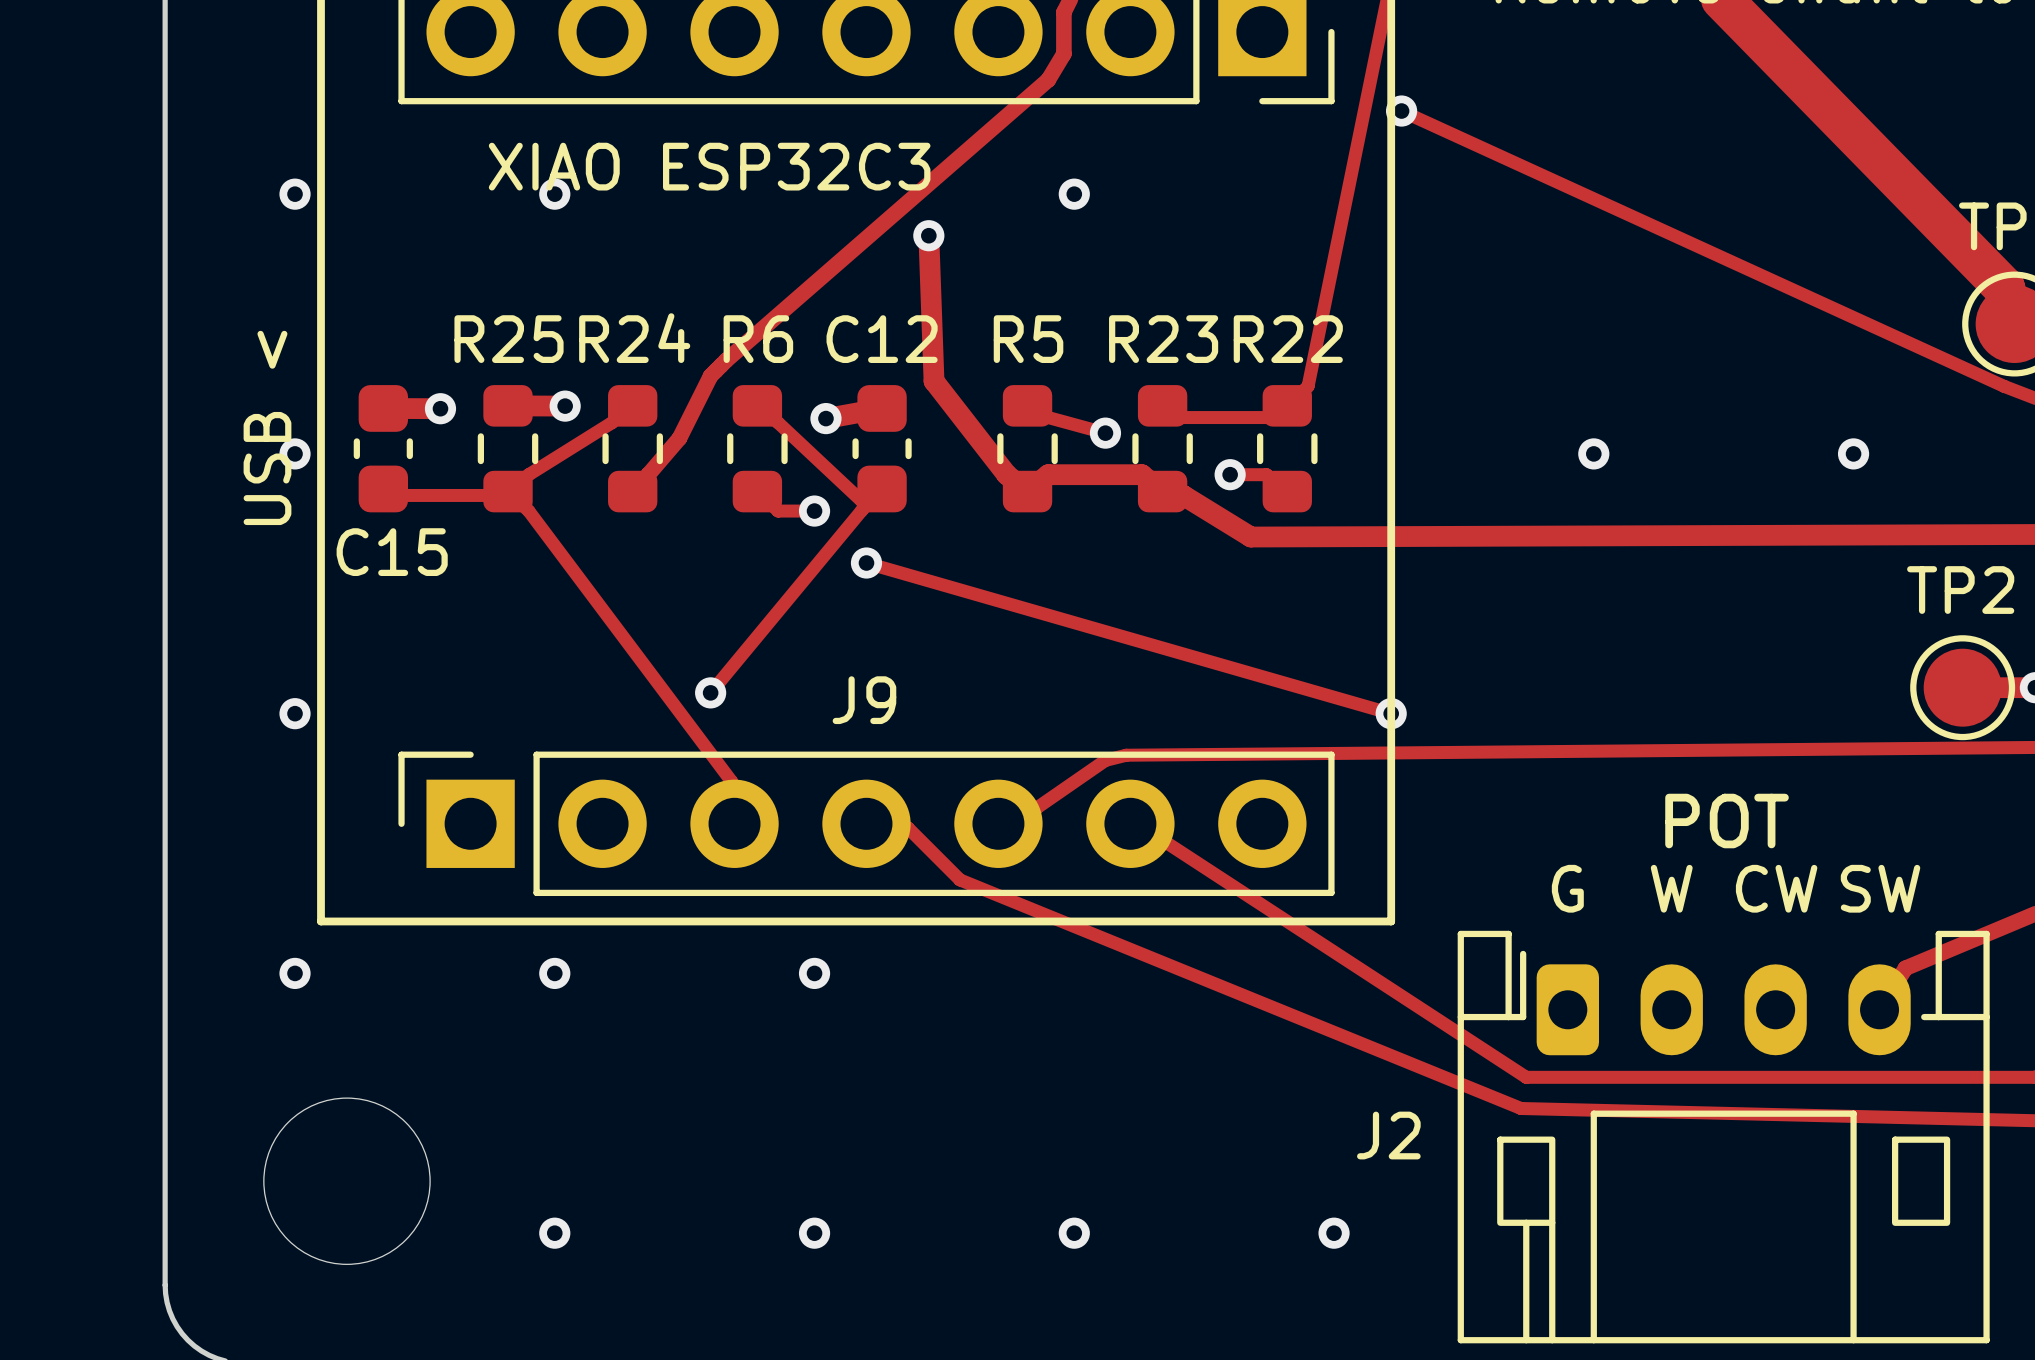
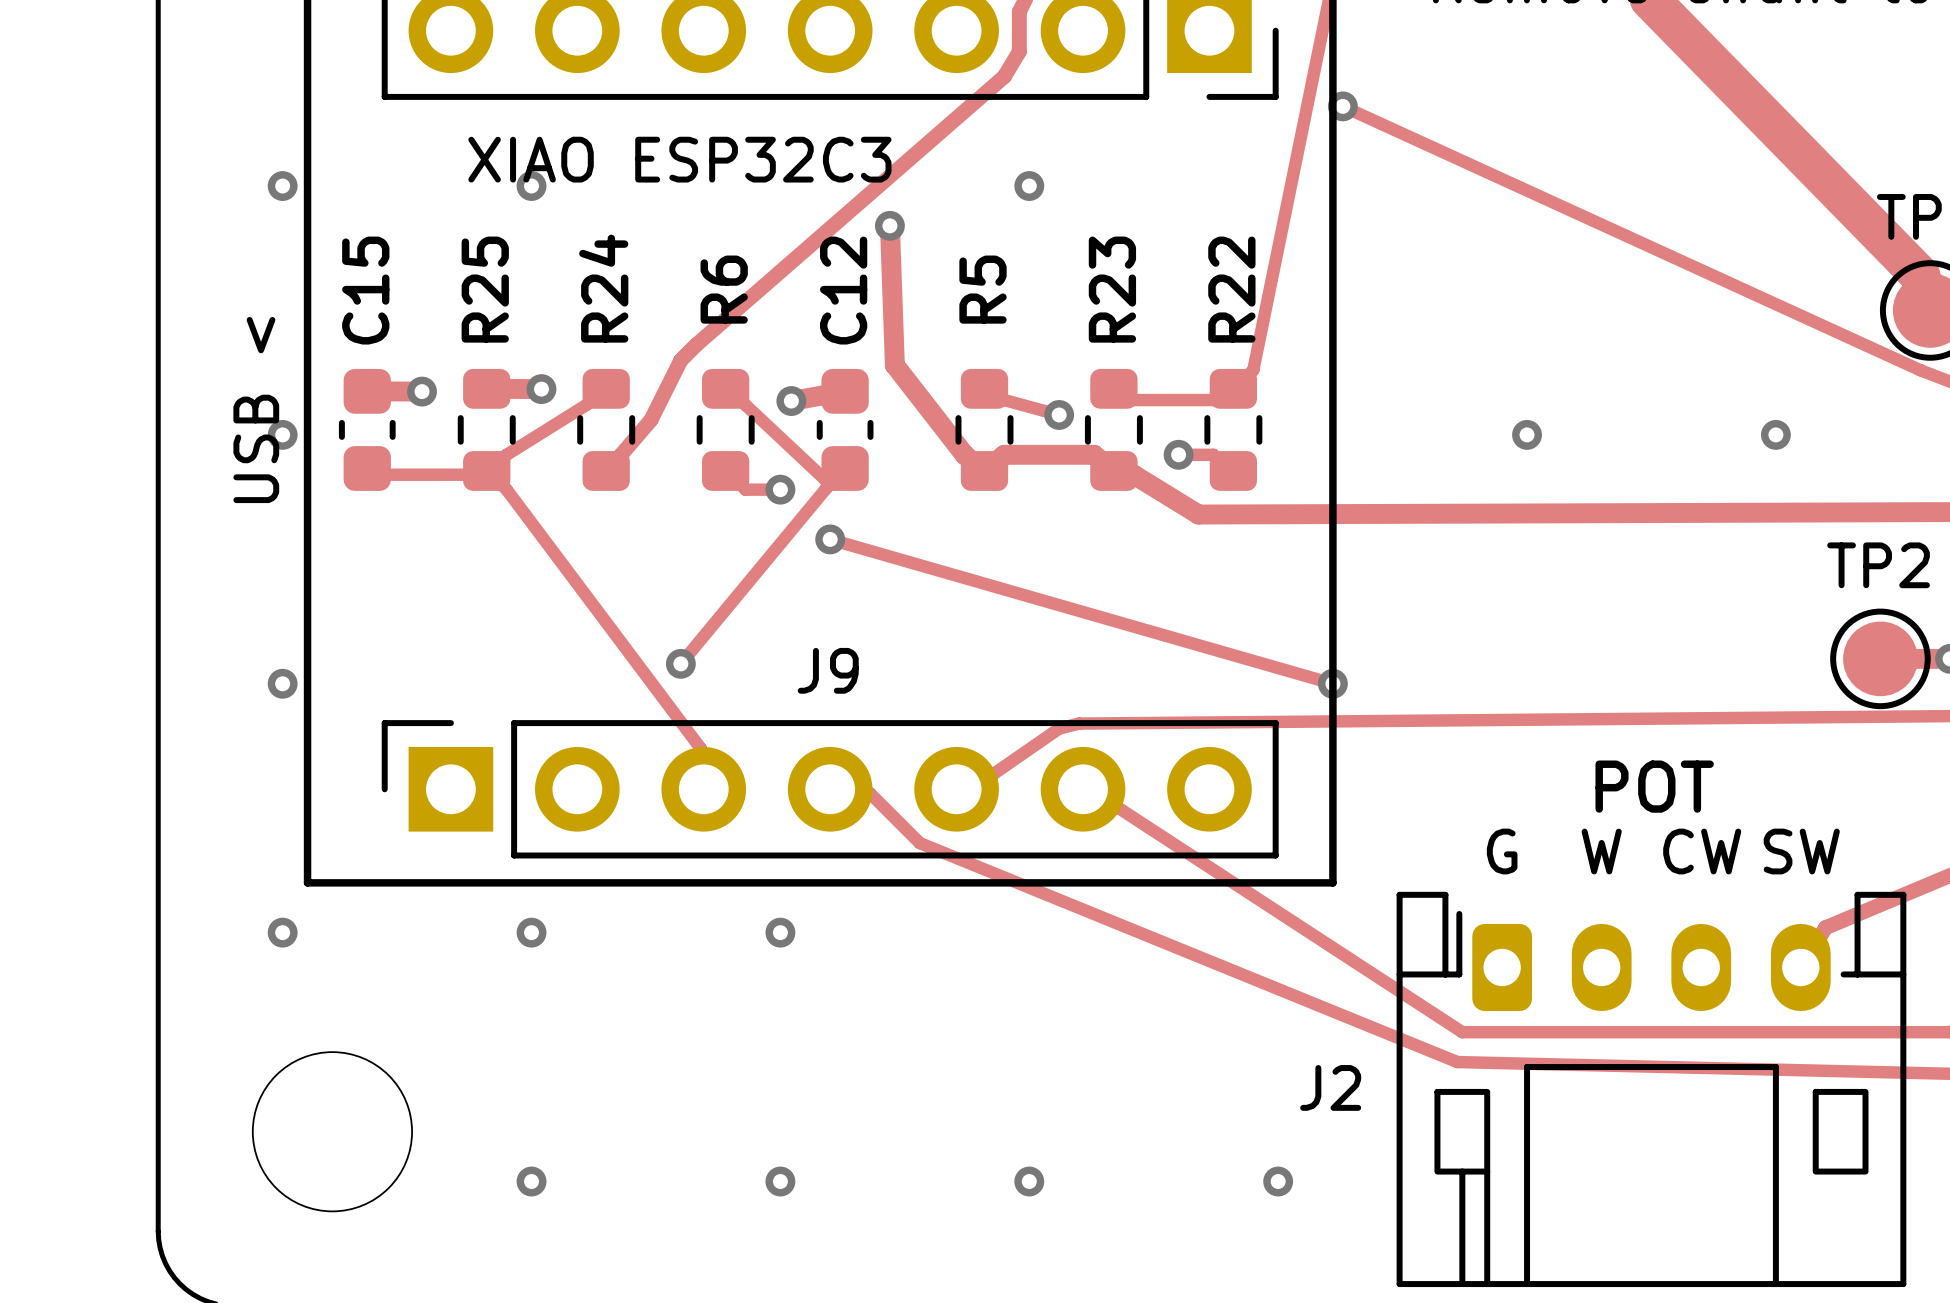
R24 name rotation: 0° (634, 338) -> 90° counterclockwise (603, 288)
R25 name rotation: 0° (509, 339) -> 90° counterclockwise (485, 289)
R6 name rotation: 0° (758, 339) -> 90° counterclockwise (724, 289)
C12 name rotation: 0° (882, 339) -> 90° counterclockwise (843, 290)
R5 name rotation: 0° (1028, 339) -> 90° counterclockwise (983, 289)
R23 name rotation: 0° (1163, 339) -> 90° counterclockwise (1112, 289)
R22 name rotation: 0° (1288, 339) -> 90° counterclockwise (1231, 289)
C15 name rotation: 0° (392, 552) -> 90° counterclockwise (365, 290)
C15 name position: C15 (392, 552) -> C15 (365, 290)

